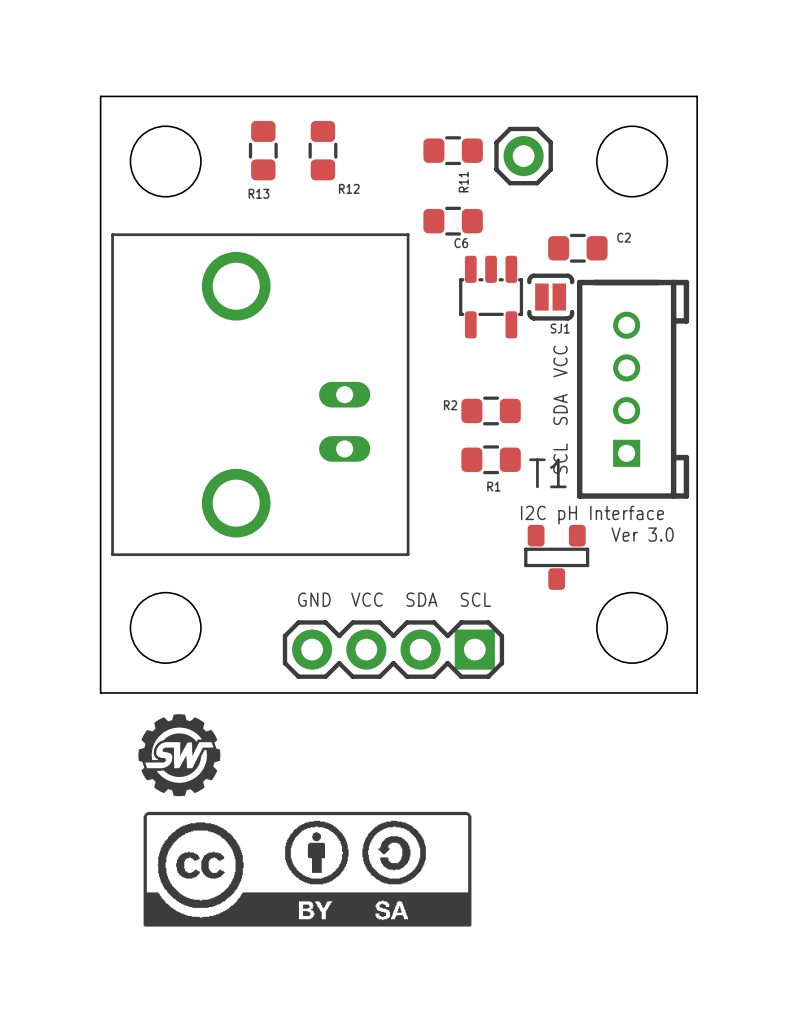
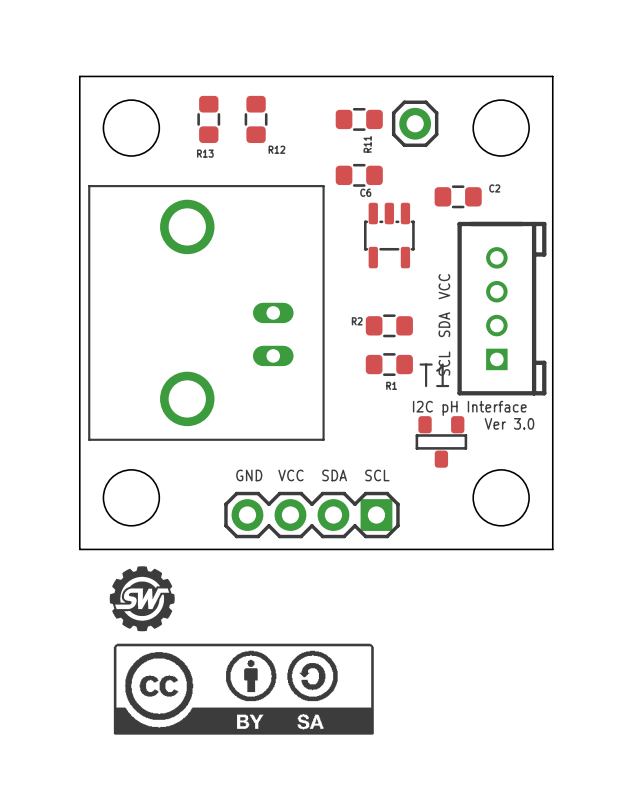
SJ1: (550, 297) -> none

